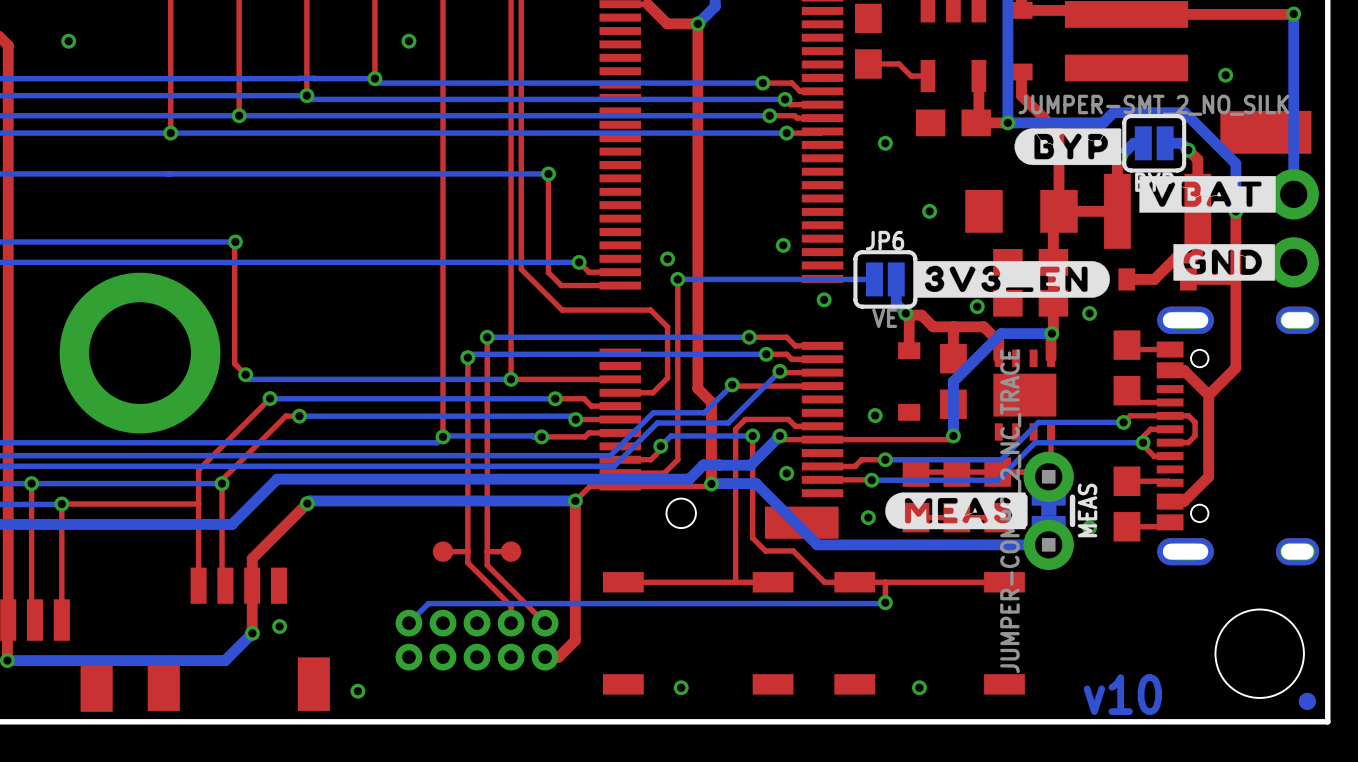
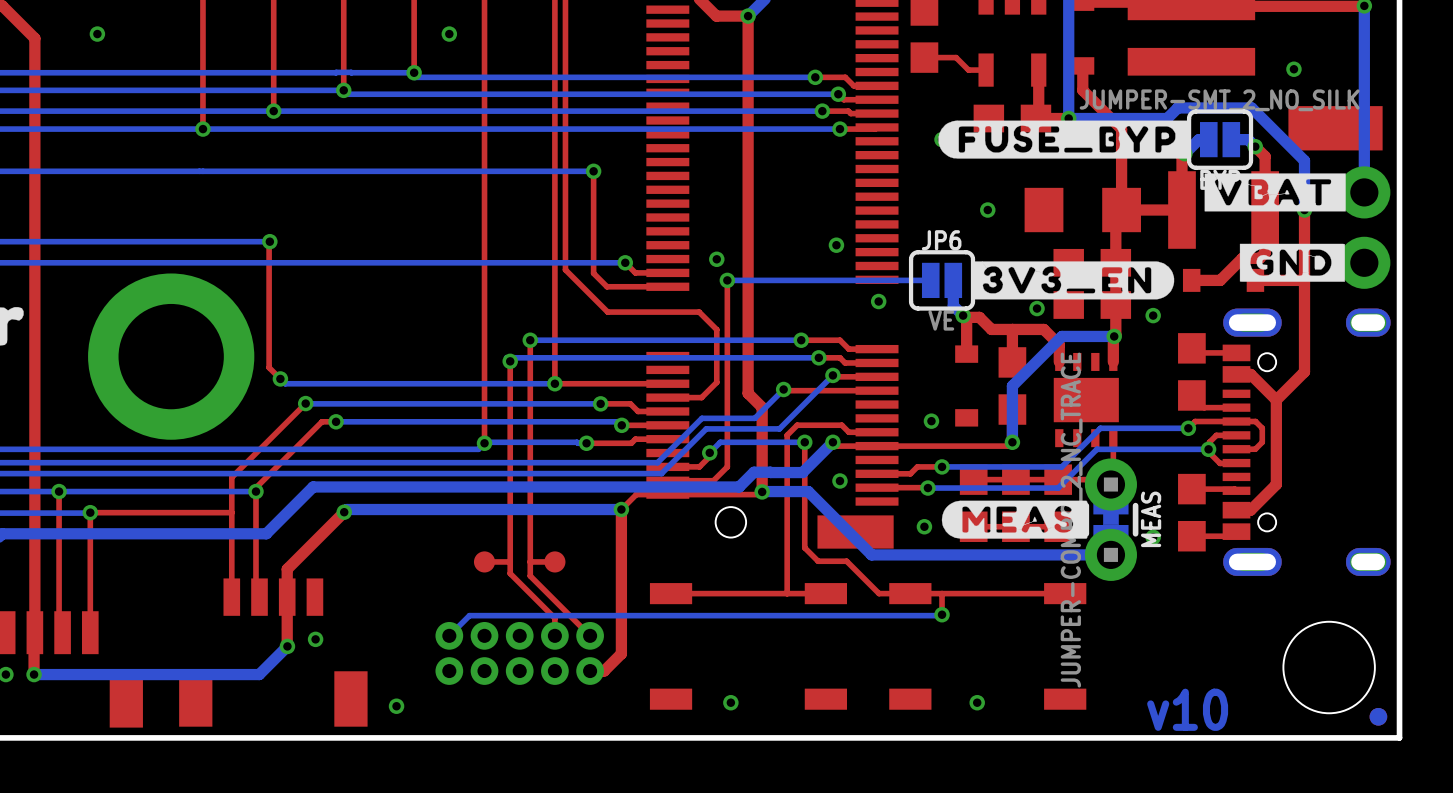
drawing: none -> [938, 120, 1190, 159]
drawing: [1014, 128, 1122, 166] -> none

